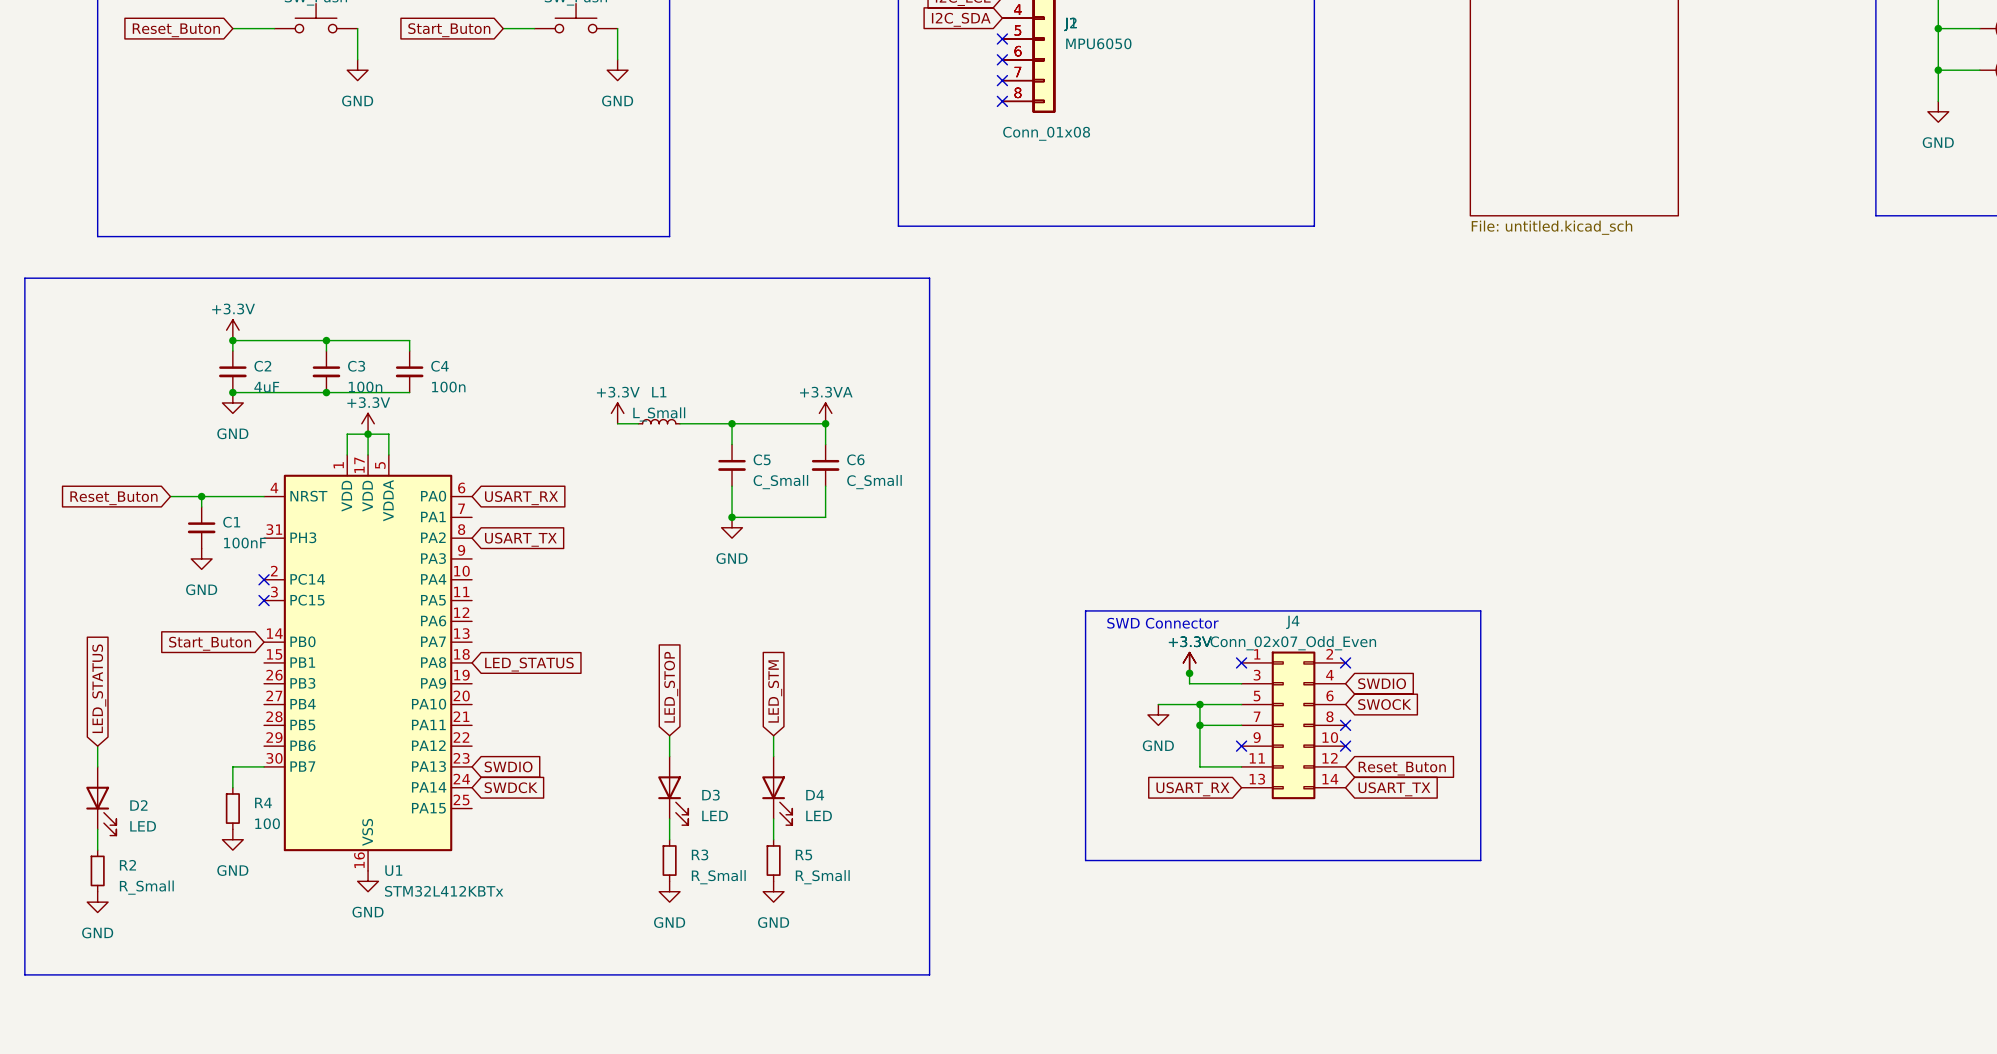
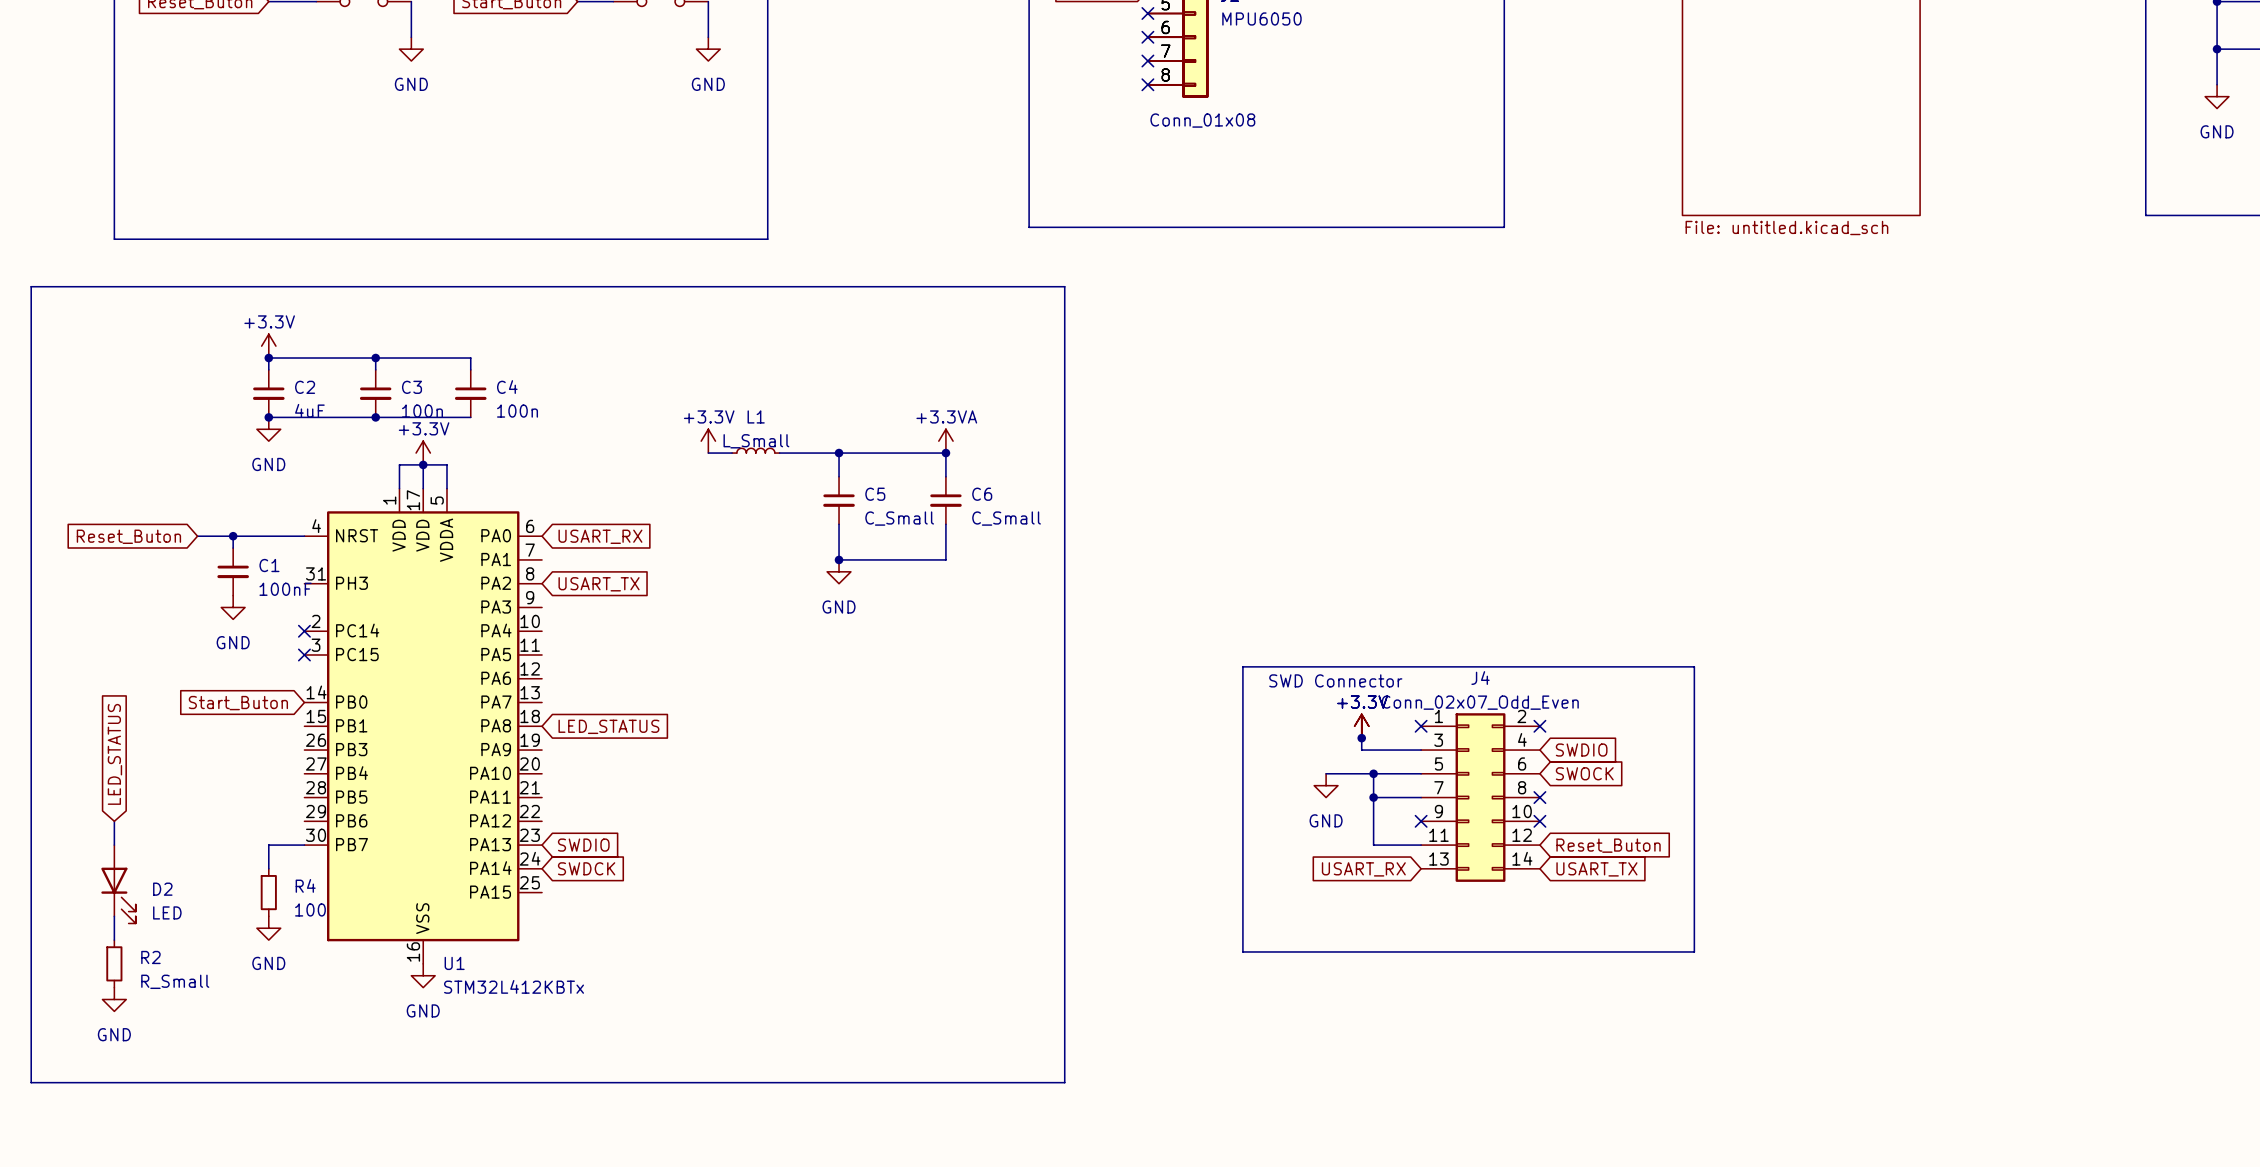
global label: LED_STOP (671, 687) -> none
global label: LED_STM (775, 691) -> none
wire: (669, 735) (669, 756) -> none
wire: (773, 735) (773, 756) -> none
D3: LED (673, 790) -> none
D4: LED (777, 790) -> none
wire: (669, 818) (669, 839) -> none
wire: (773, 818) (773, 839) -> none
R3: R_Small (669, 860) -> none
R5: R_Small (773, 860) -> none
power symbol: GND (669, 891) -> none
power symbol: GND (773, 891) -> none

